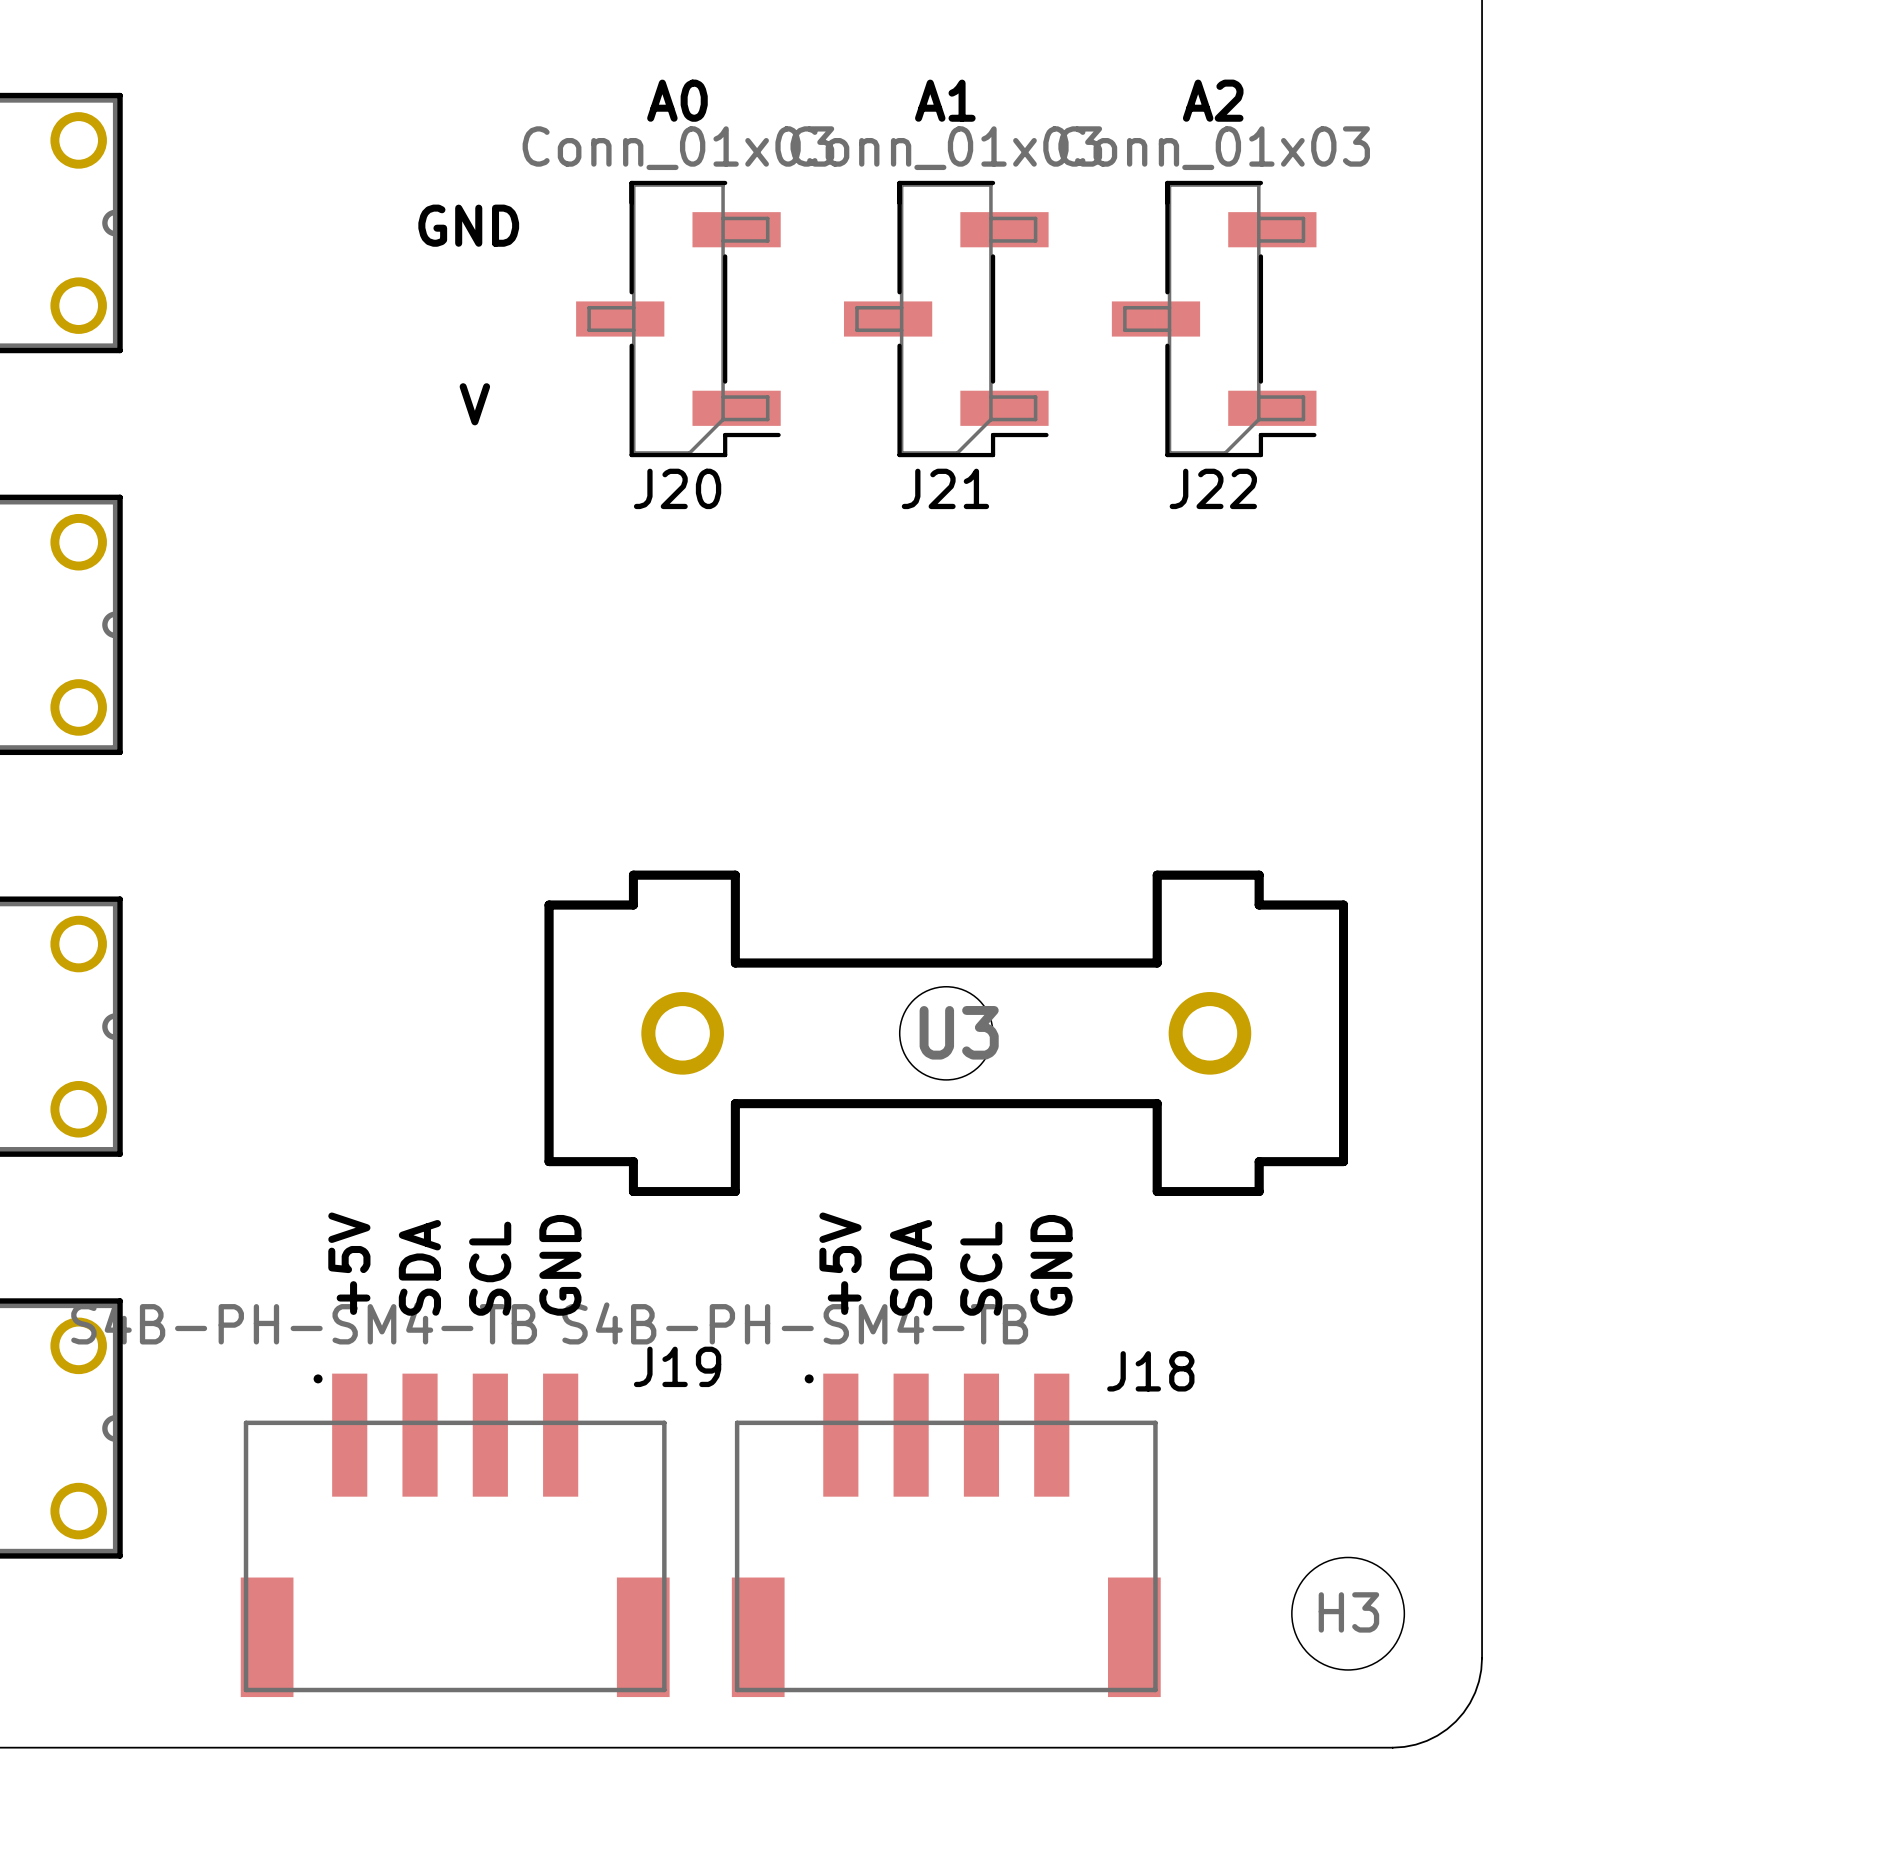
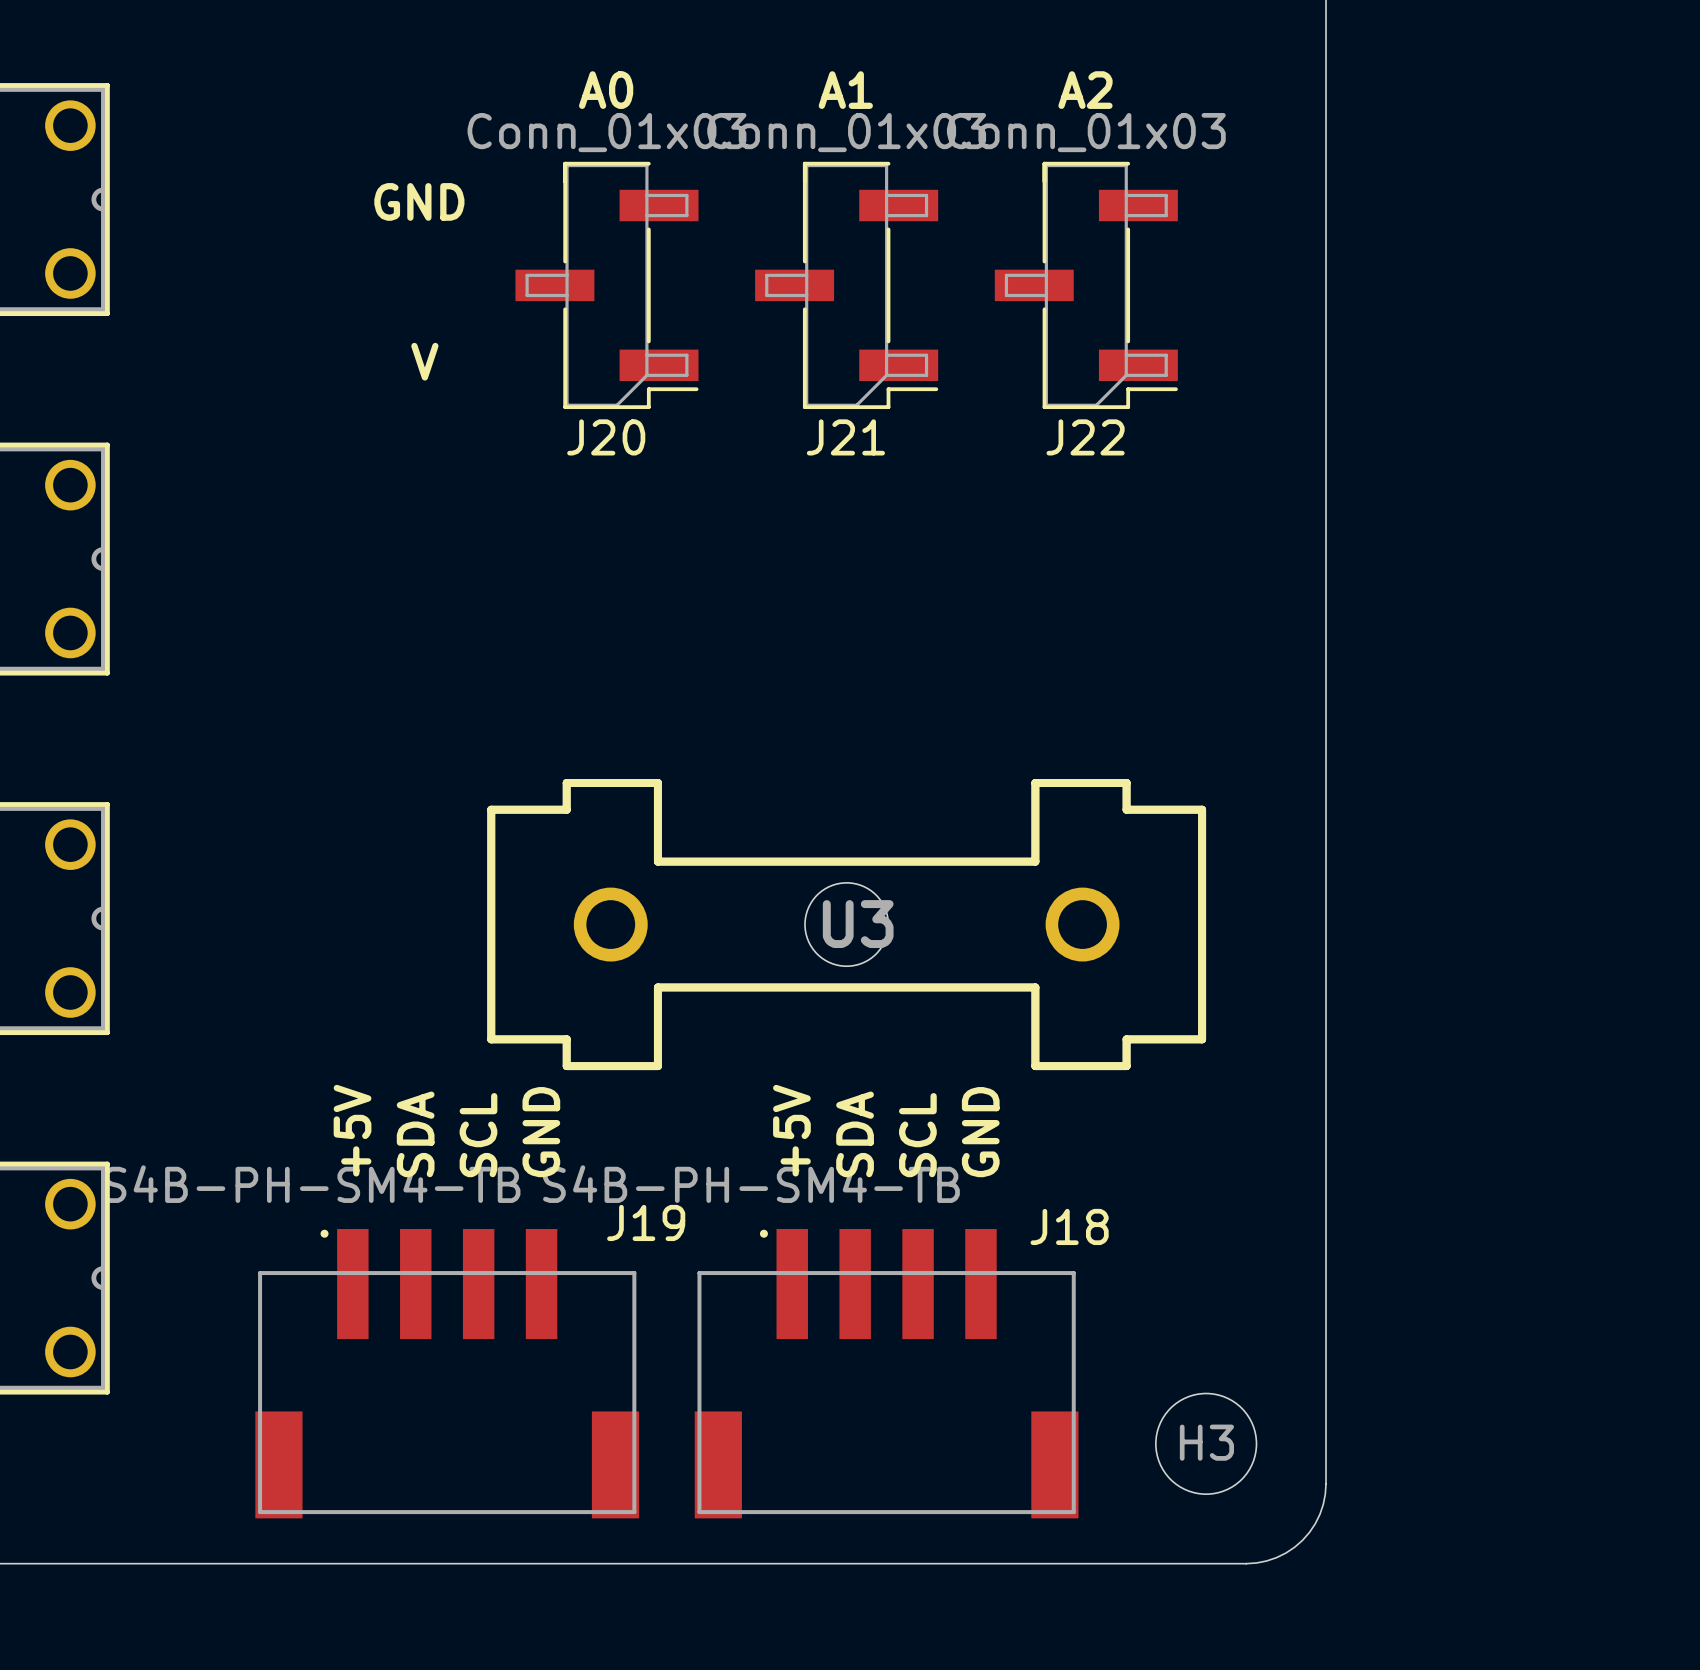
text position: +5V (349, 1263) -> +5V (352, 1130)
text position: +5V (840, 1263) -> +5V (791, 1130)
text position: GND (560, 1265) -> GND (541, 1132)
text position: GND (1051, 1265) -> GND (980, 1132)
text position: SDA (419, 1267) -> SDA (415, 1134)
text position: SDA (911, 1267) -> SDA (855, 1134)
text position: SCL (490, 1268) -> SCL (478, 1135)
text position: SCL (981, 1268) -> SCL (917, 1135)
J19 position: (455, 1535) -> (447, 1373)
J18 position: (946, 1535) -> (886, 1373)

